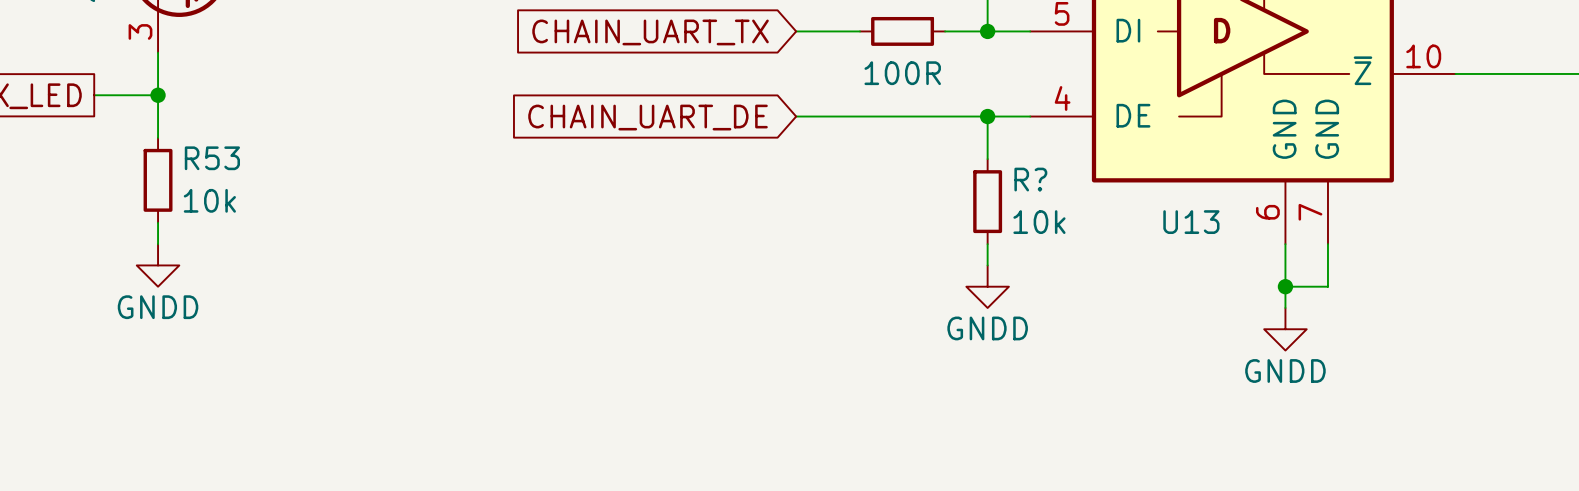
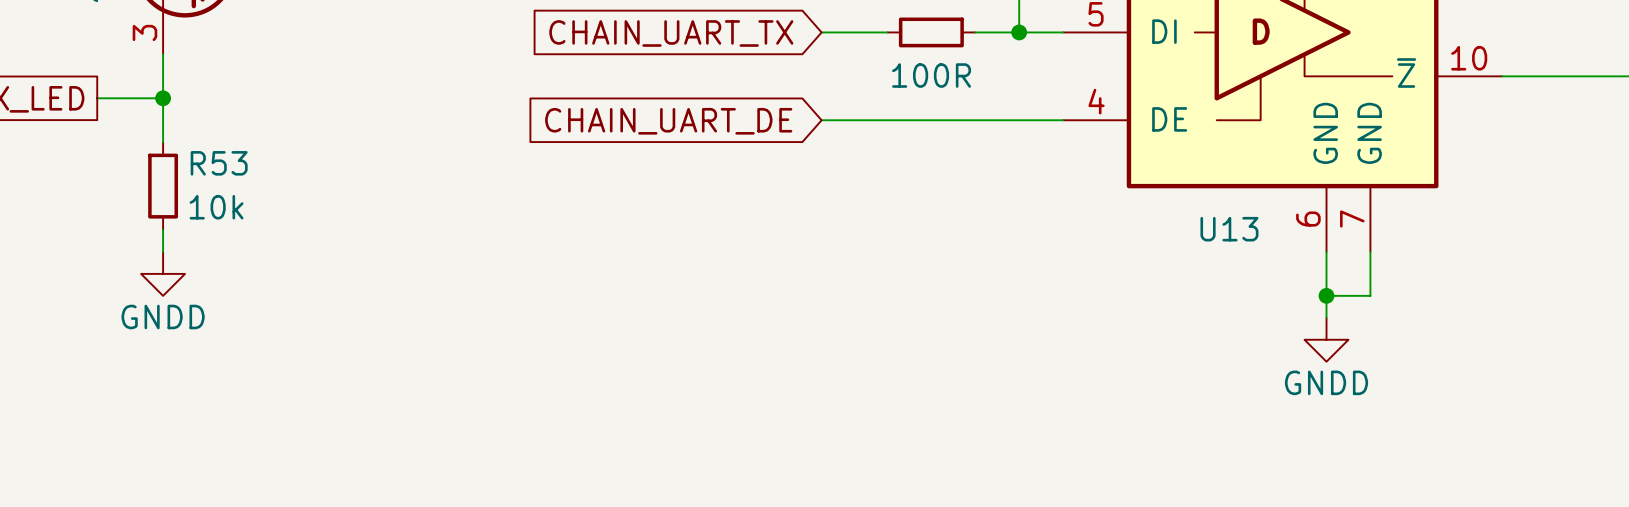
wire: (987, 116) (987, 159) -> none
junction: (987, 116) -> none
R?: 10k (987, 201) -> none
wire: (987, 244) (987, 265) -> none
power symbol: GNDD (987, 286) -> none

